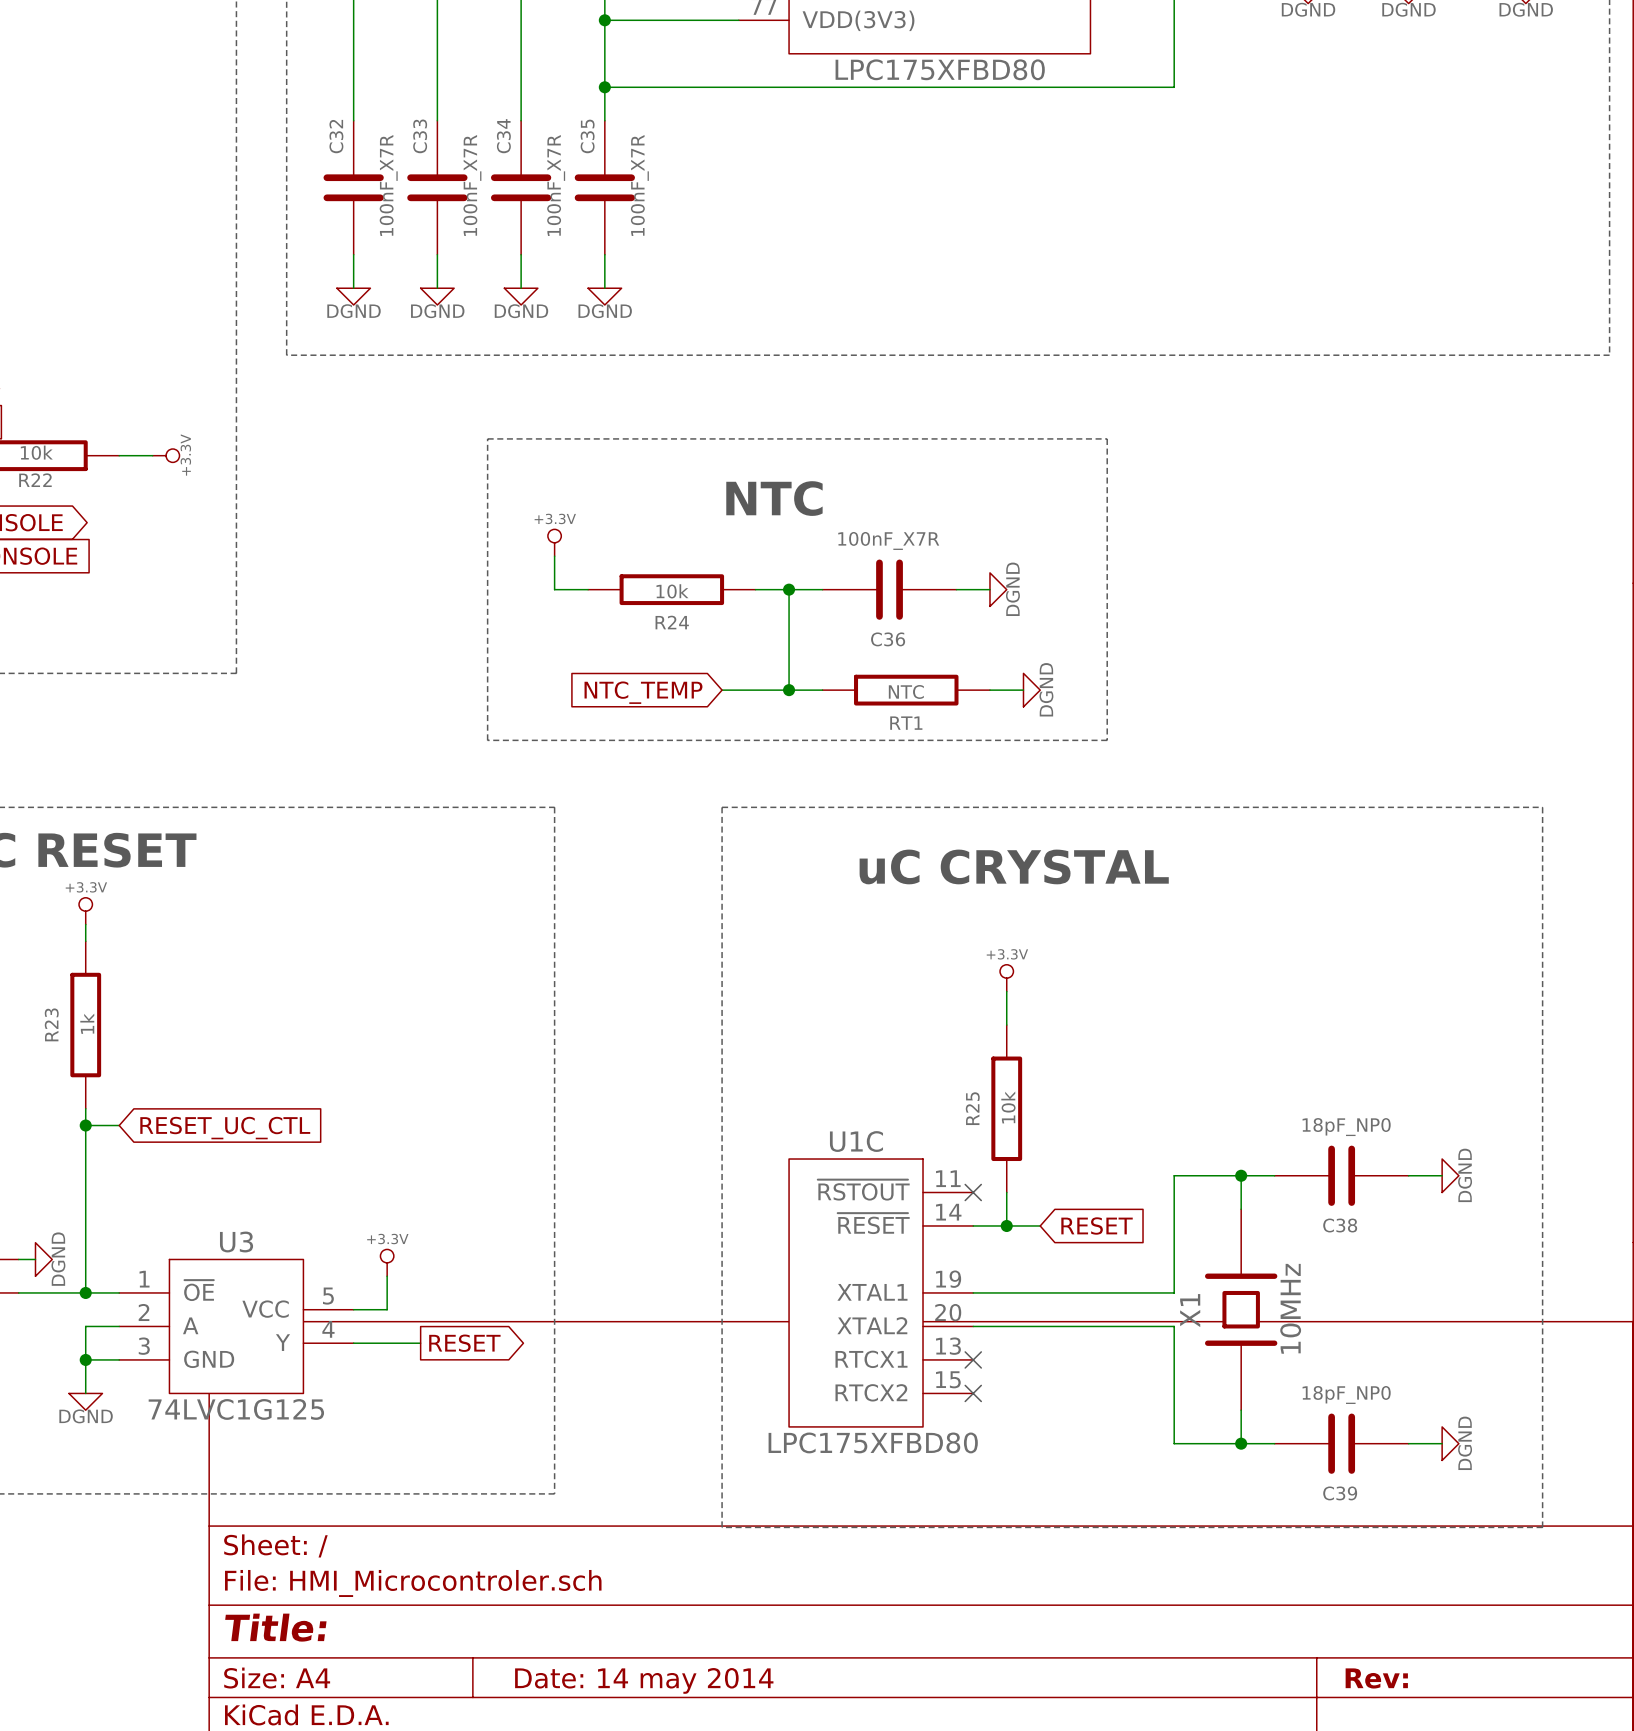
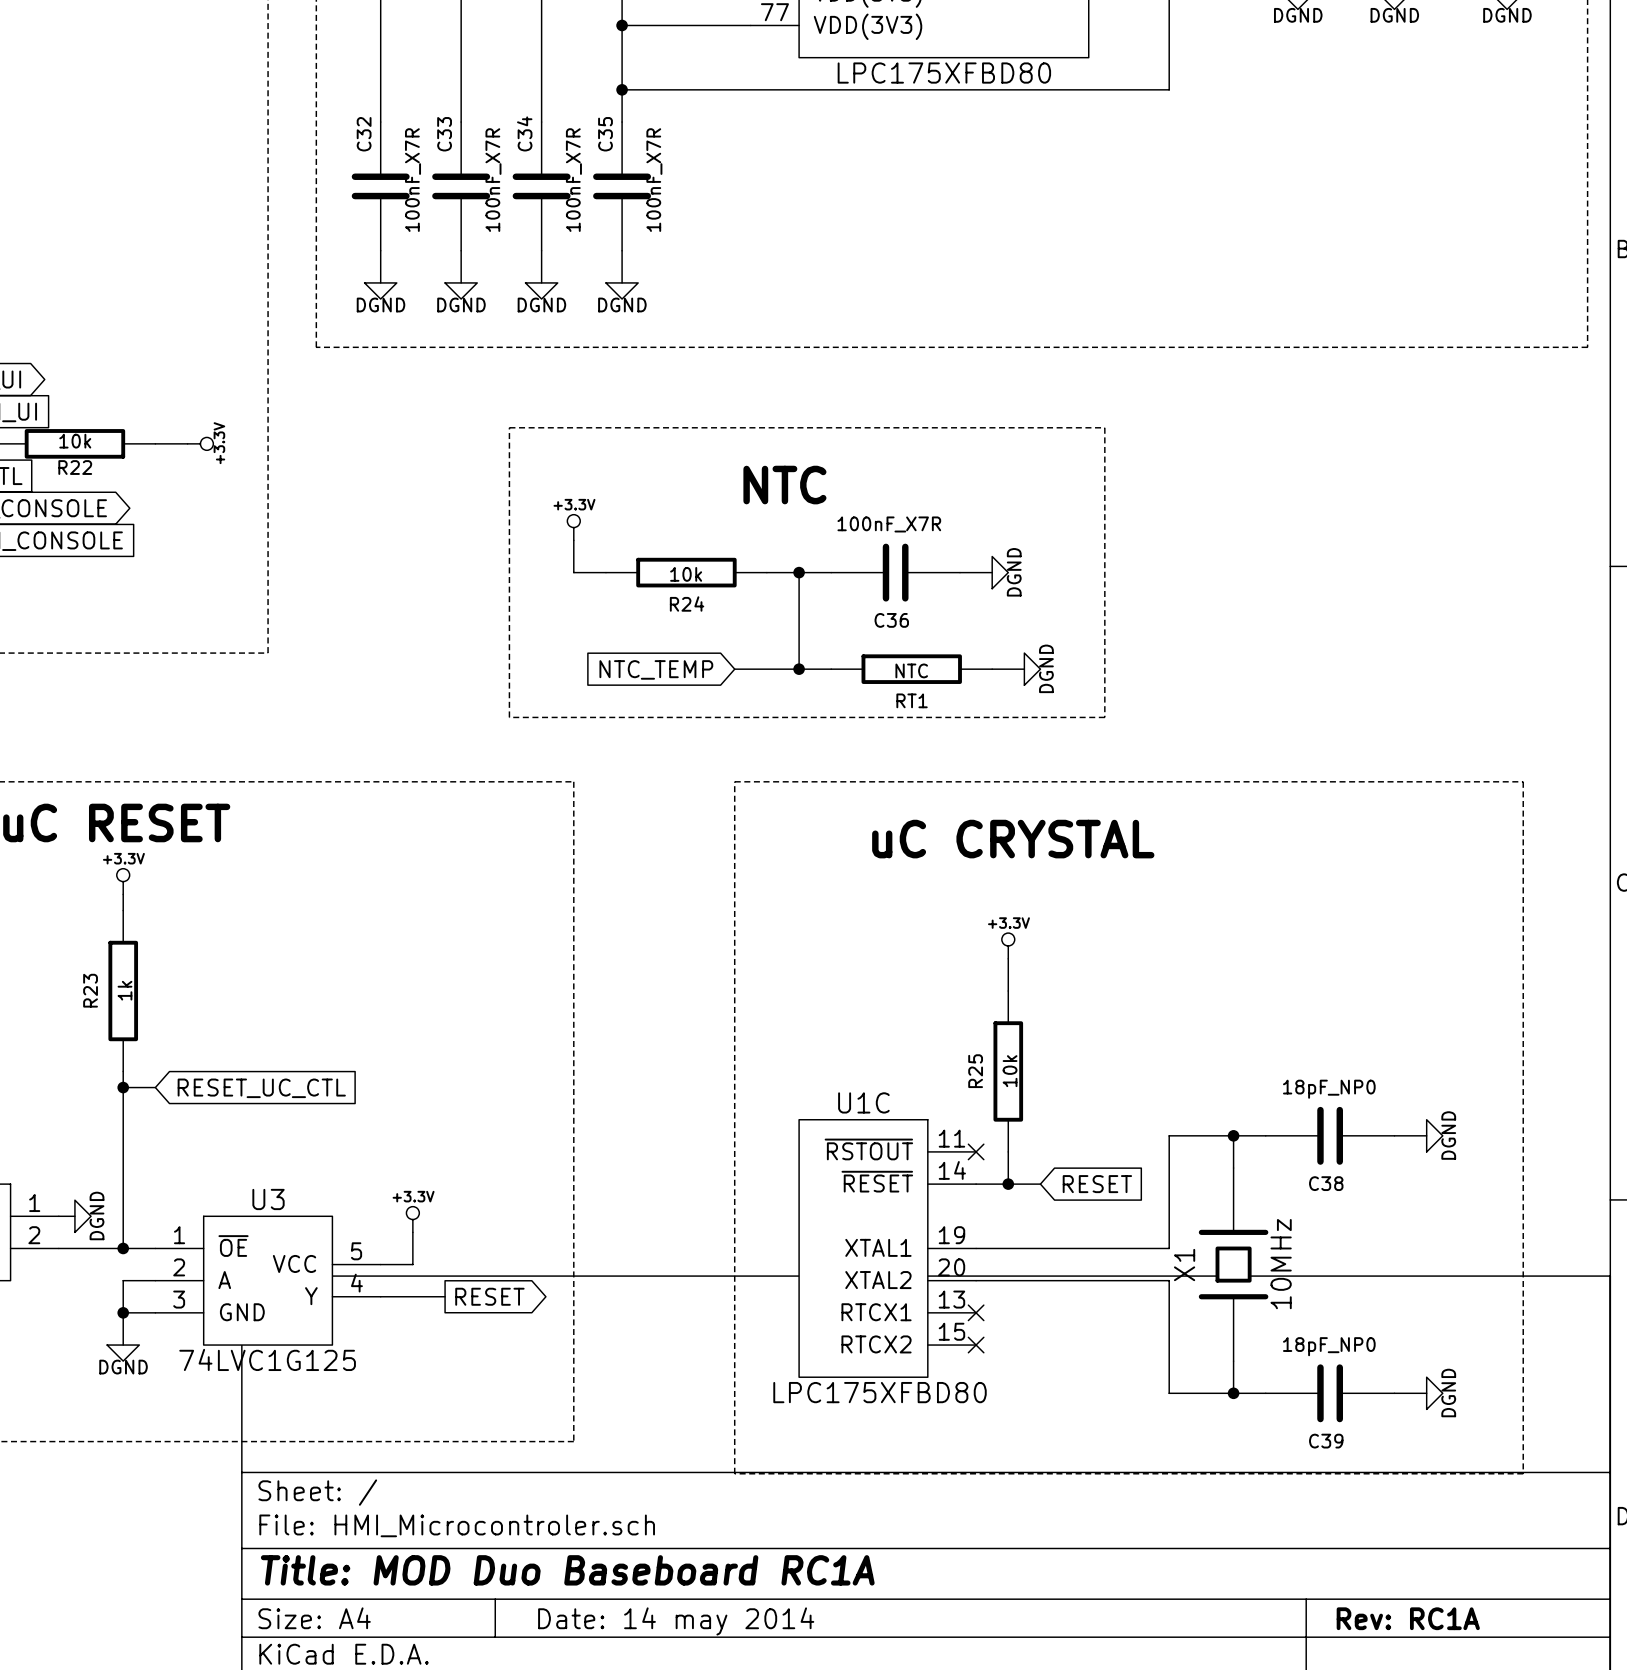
title block: Title: (275, 1627) -> Title: MOD Duo Baseboard RC1A (567, 1570)
title block: Rev: (1376, 1678) -> Rev: RC1A (1408, 1618)

